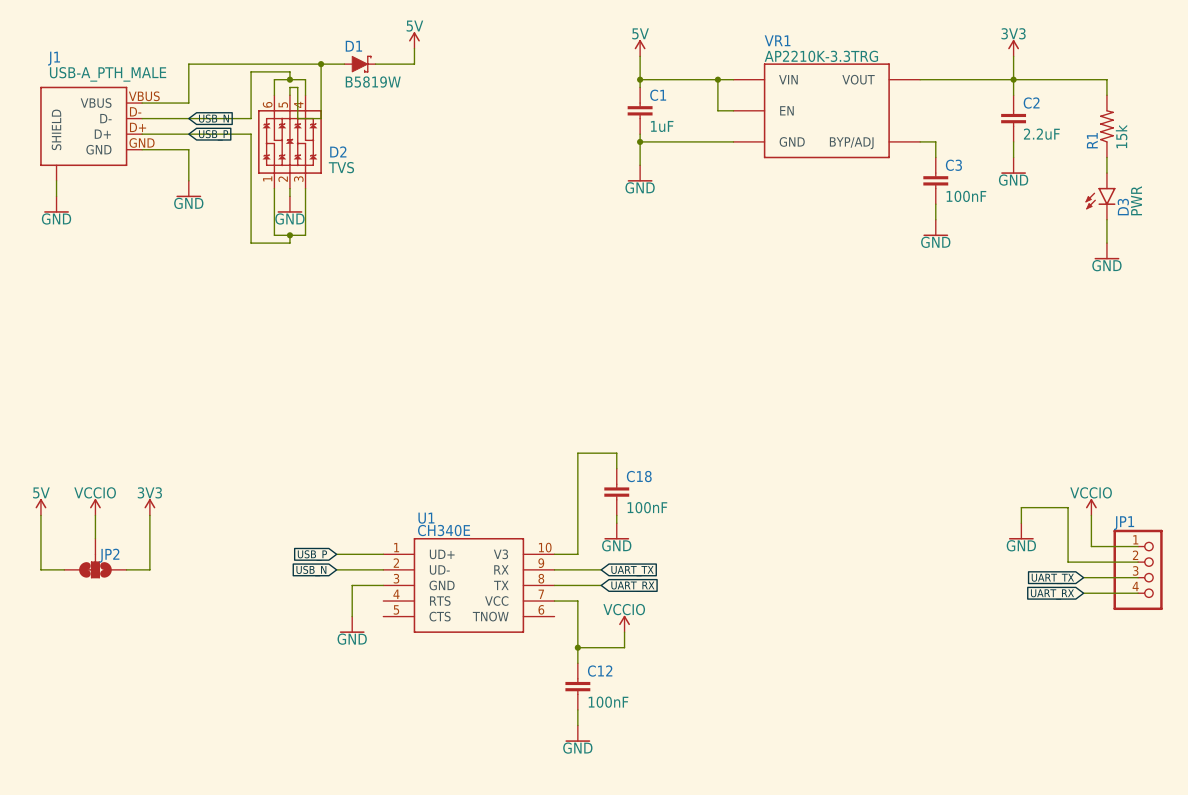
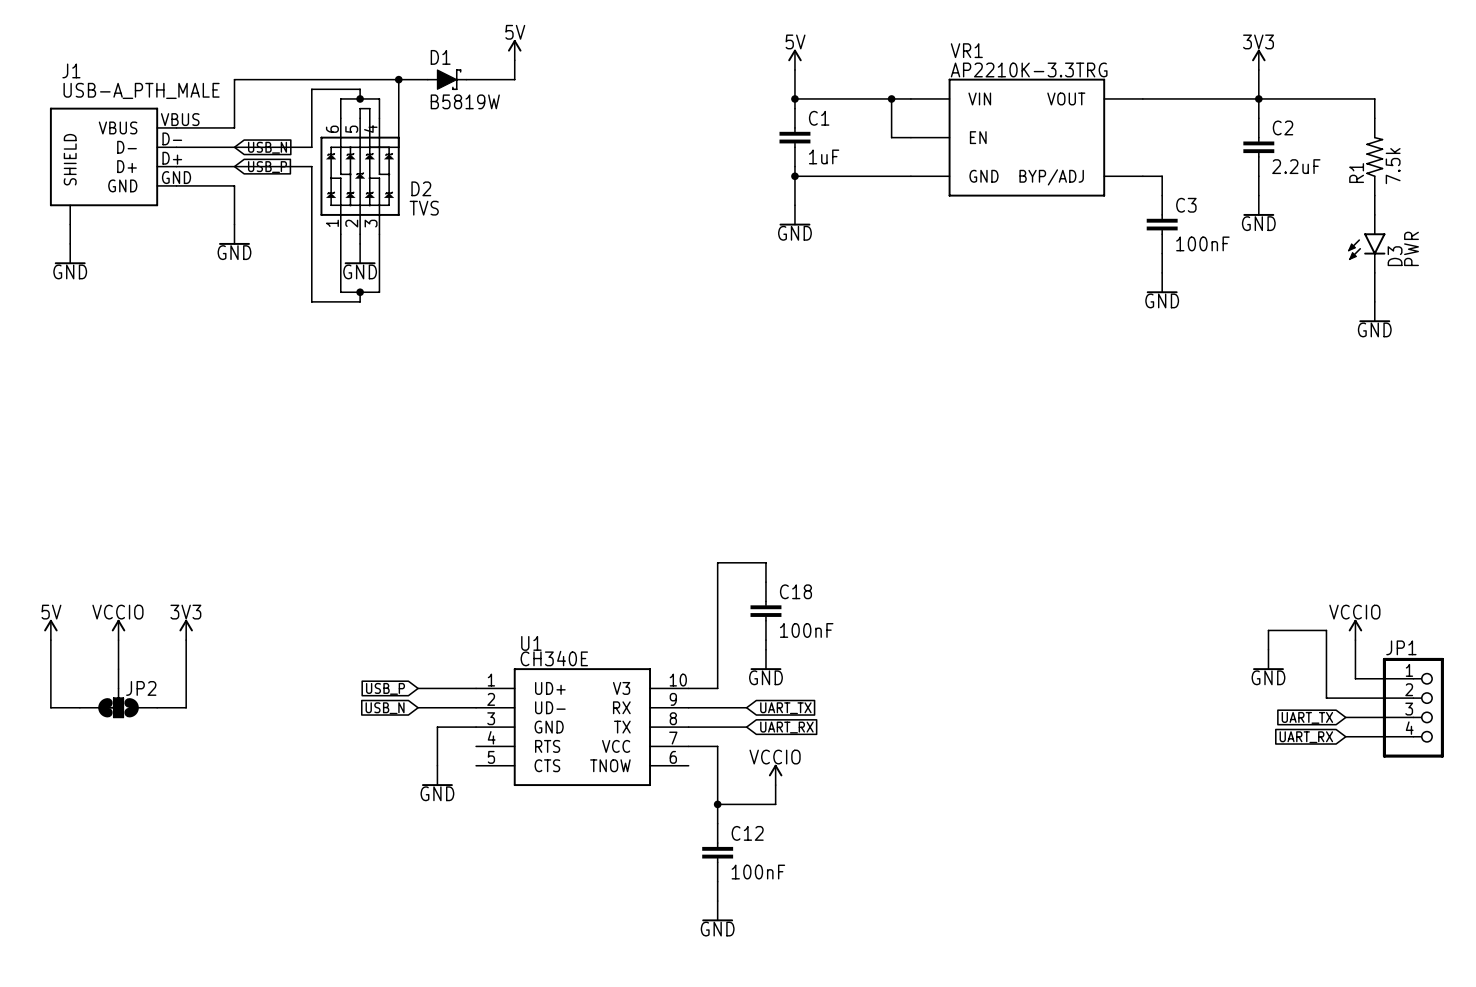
R1 value: 15k (1121, 136) -> 7.5k (1393, 166)

